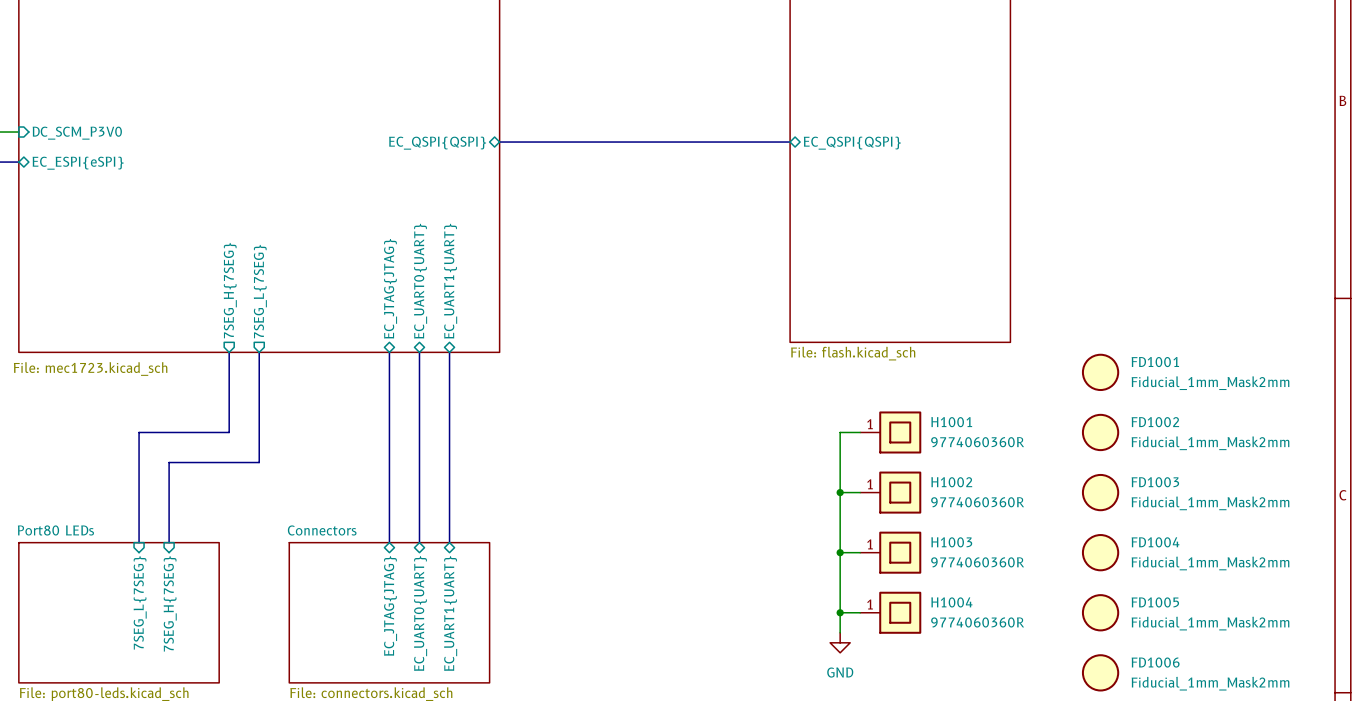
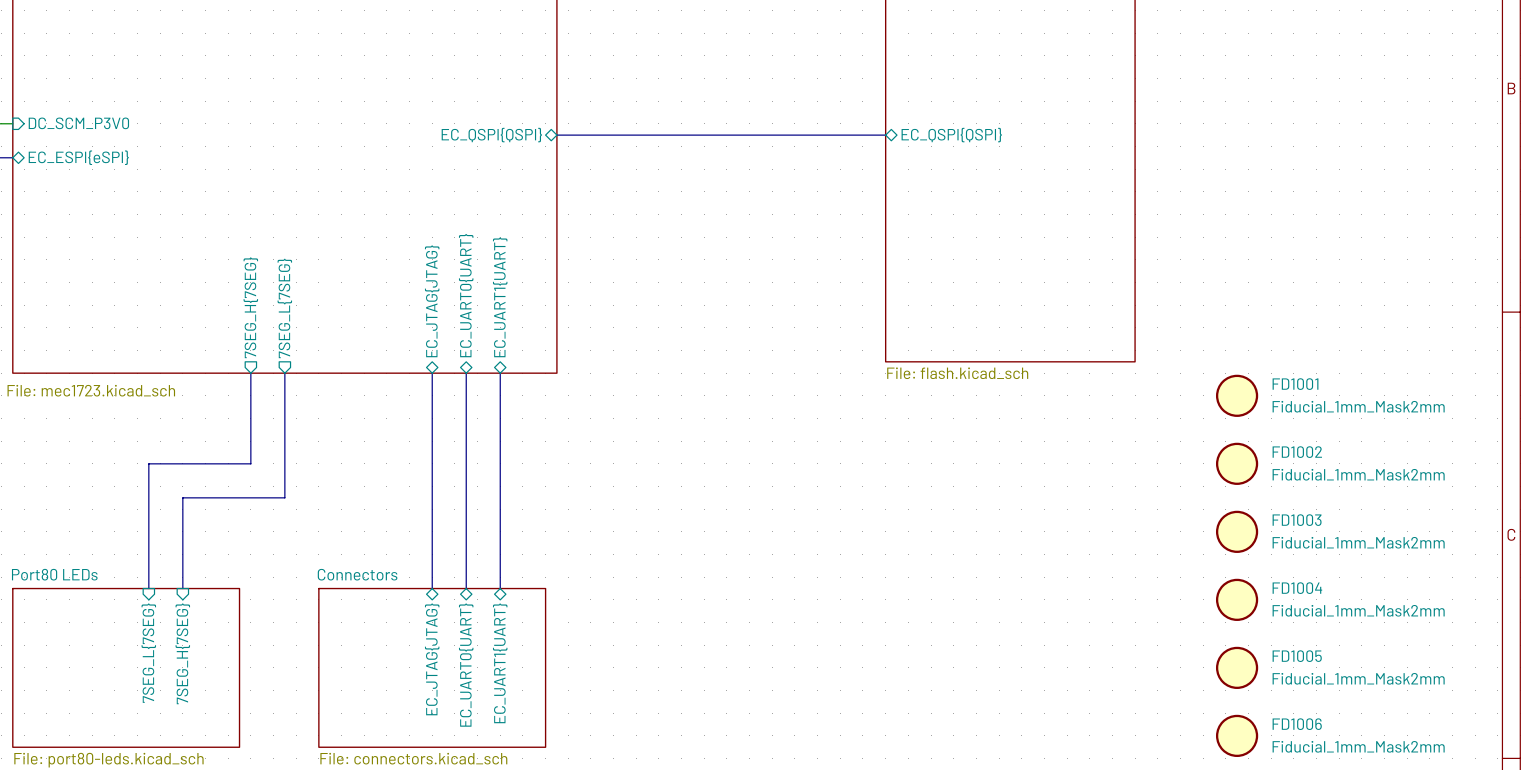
wire: (860, 432) (840, 432) (840, 632) -> none
H1001: (890, 432) -> none
wire: (840, 492) (860, 492) -> none
junction: (840, 492) -> none
H1002: (890, 492) -> none
wire: (840, 552) (860, 552) -> none
junction: (840, 552) -> none
H1003: (890, 552) -> none
wire: (840, 612) (860, 612) -> none
junction: (840, 612) -> none
H1004: (890, 612) -> none
power symbol: GND (840, 642) -> none

